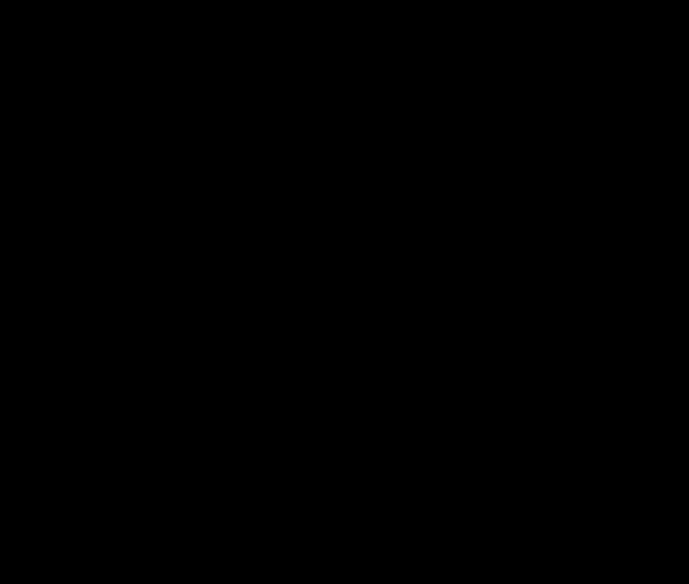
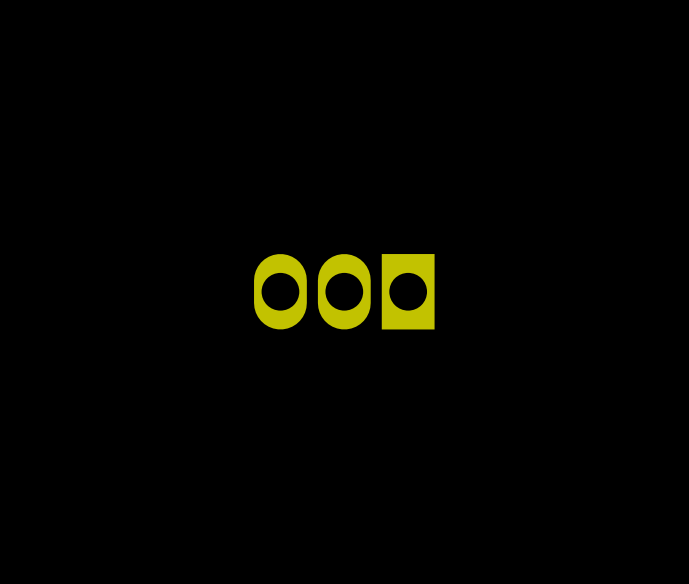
part: none -> (344, 291)

